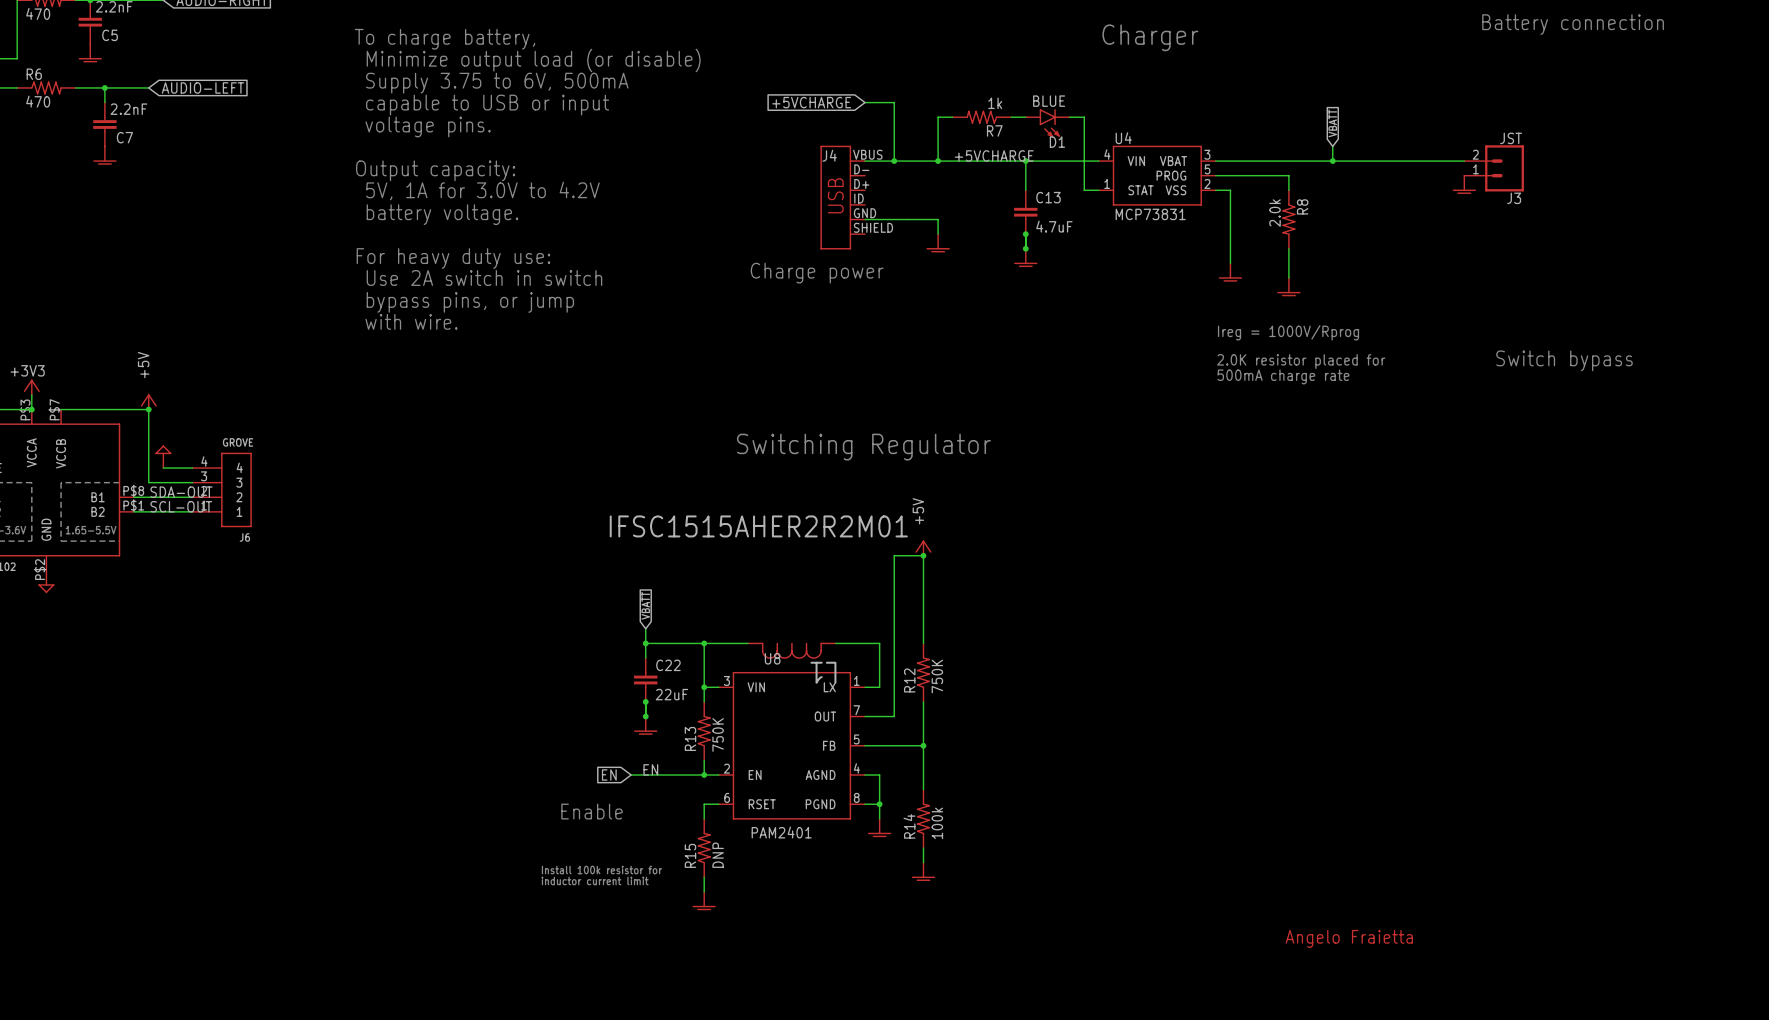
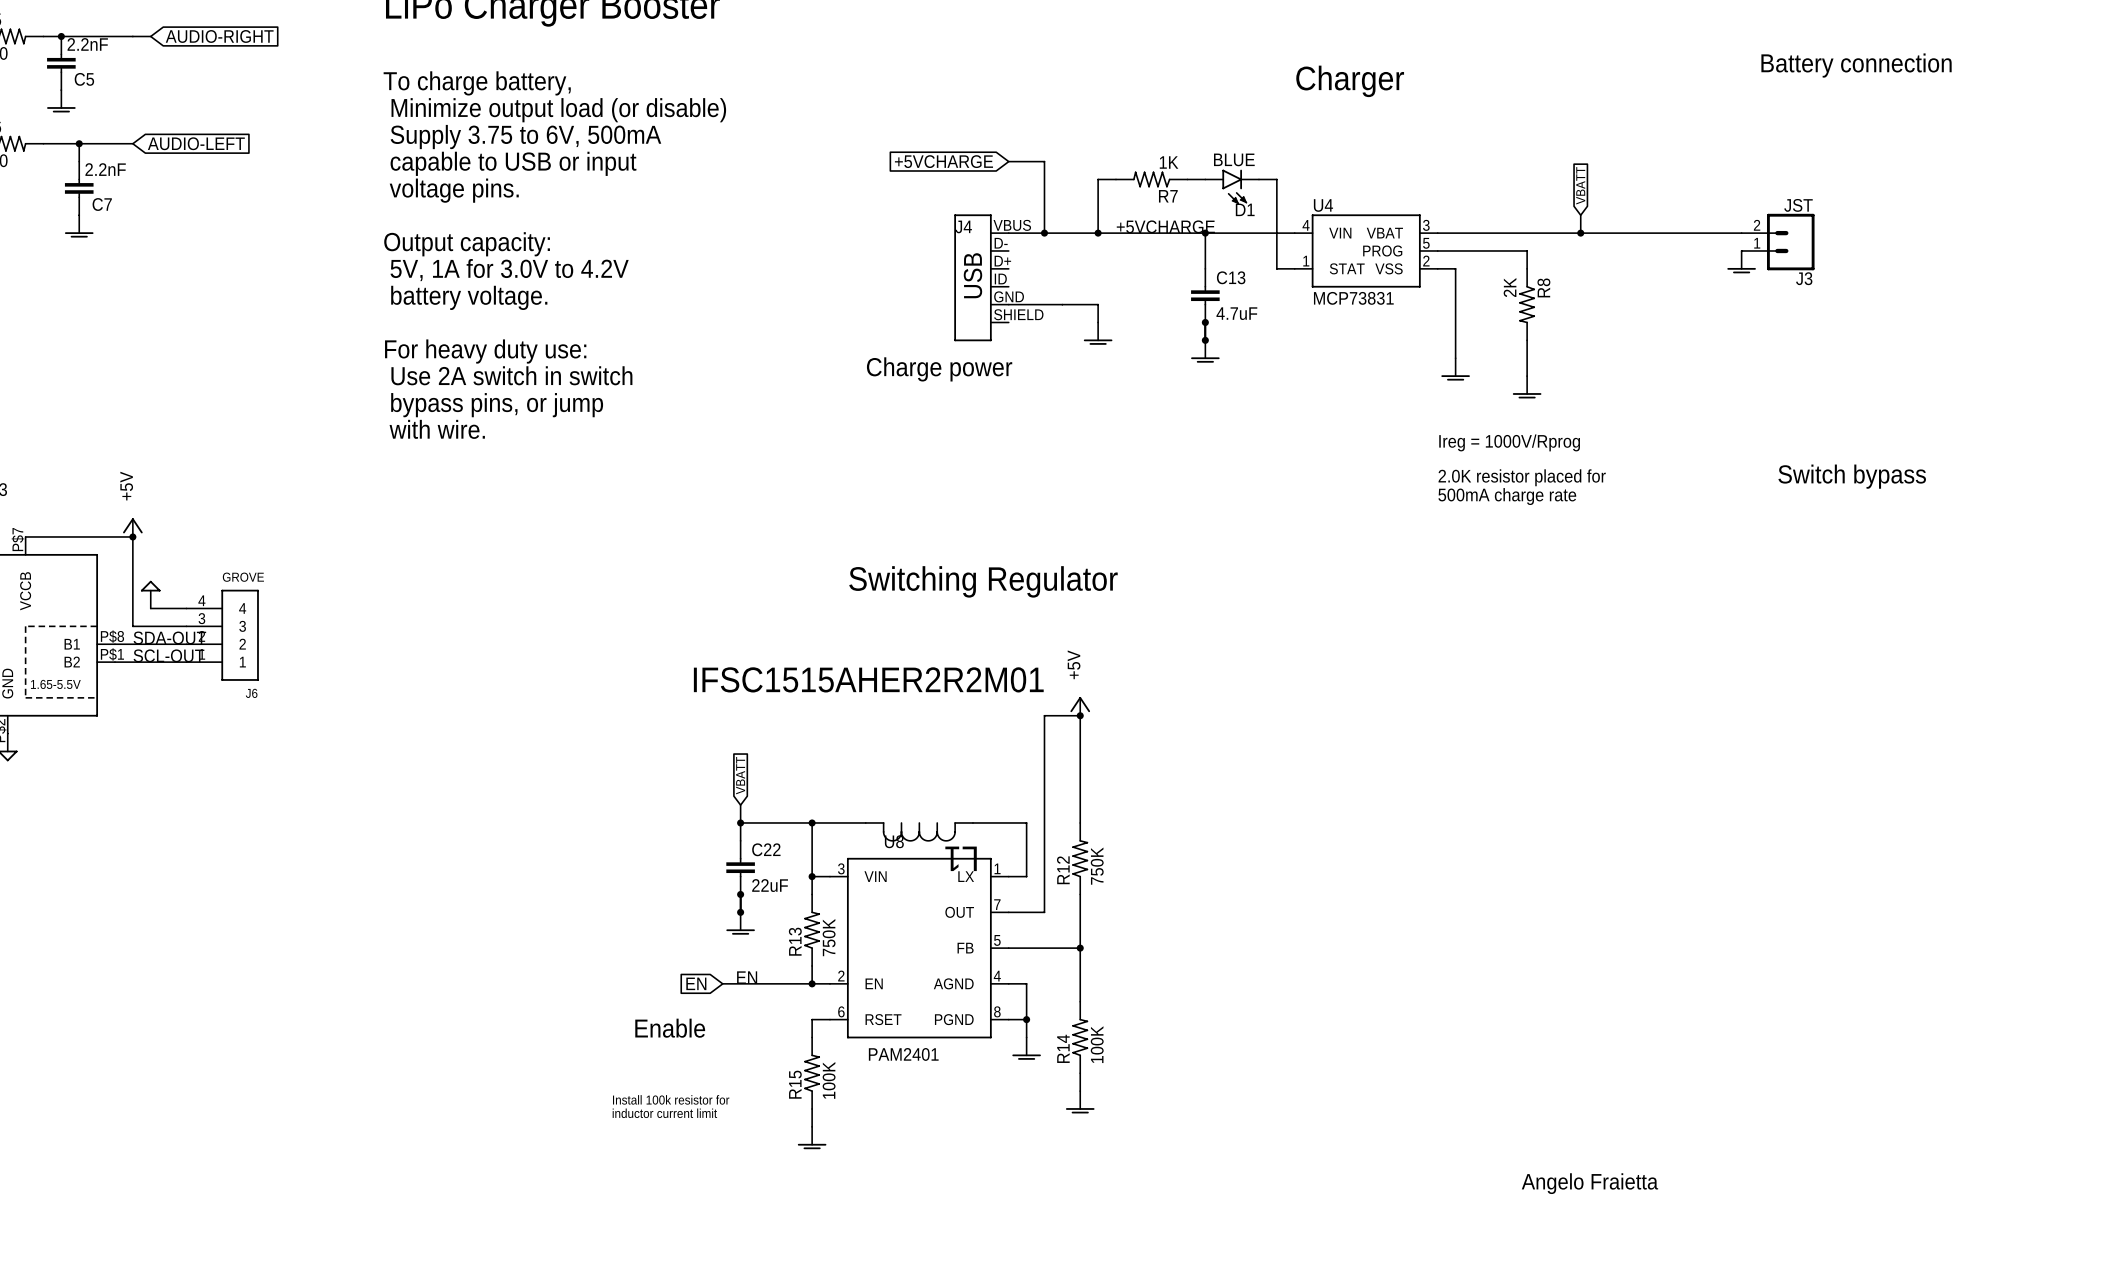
R7 value: 1k (995, 103) -> 1K (1169, 162)
R8 value: 2.0k (1275, 213) -> 2K (1510, 287)
R14 value: 100k (937, 823) -> 100K (1097, 1044)
R15 value: DNP (718, 855) -> 100K (829, 1080)

